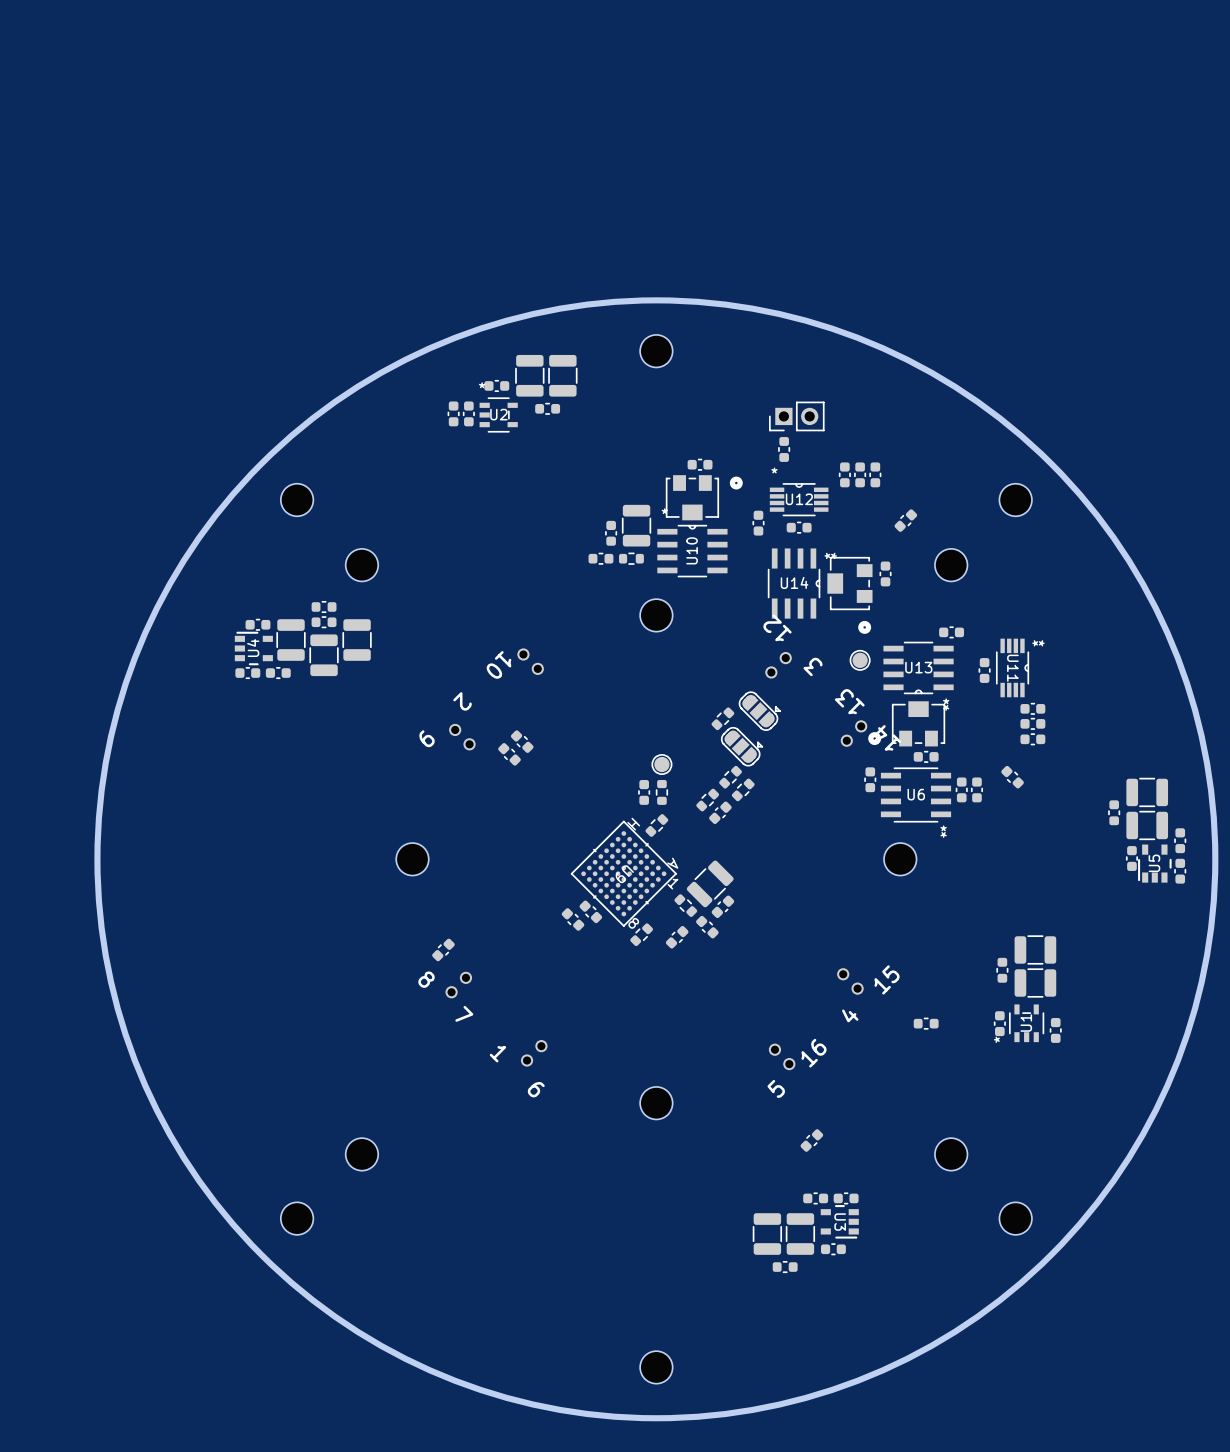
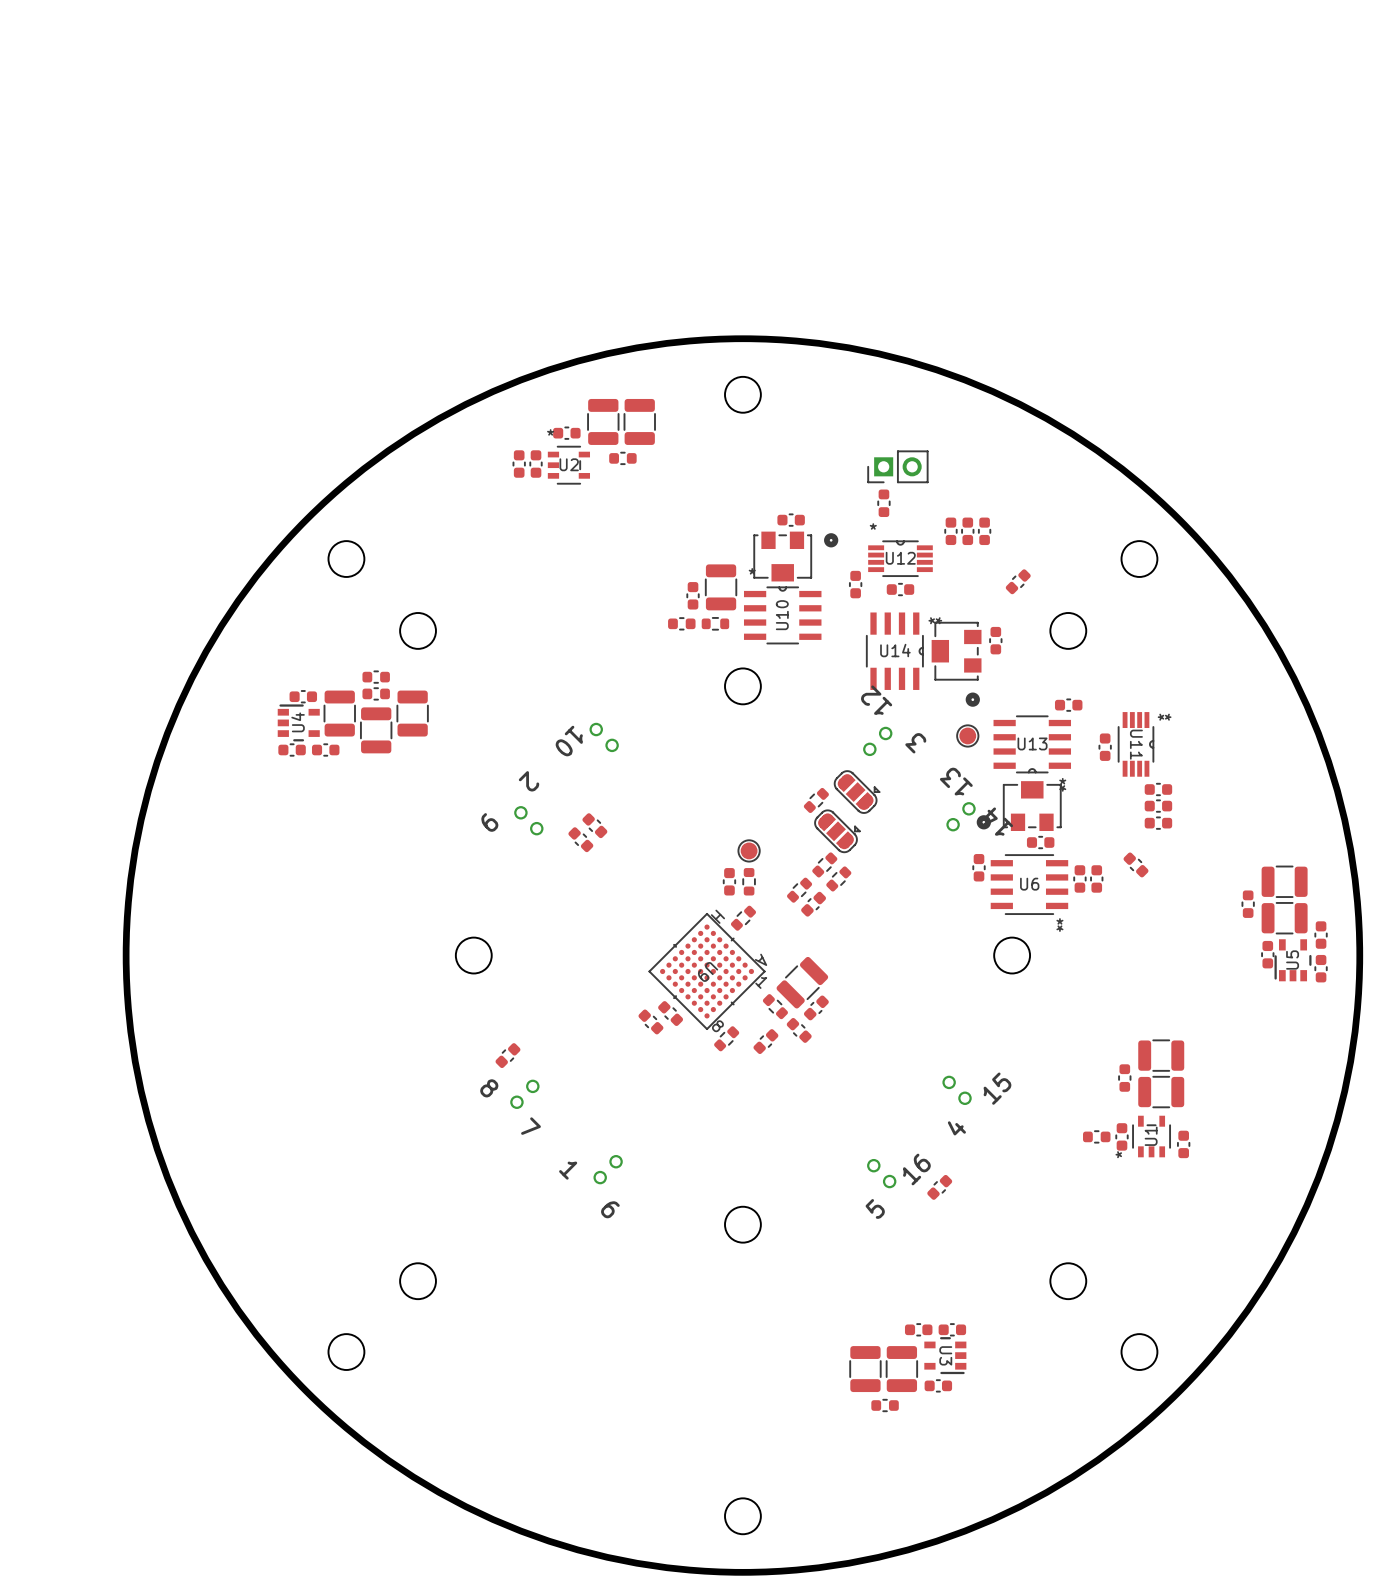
part position: (926, 1023) -> (1096, 1136)
part position: (811, 1140) -> (939, 1187)

